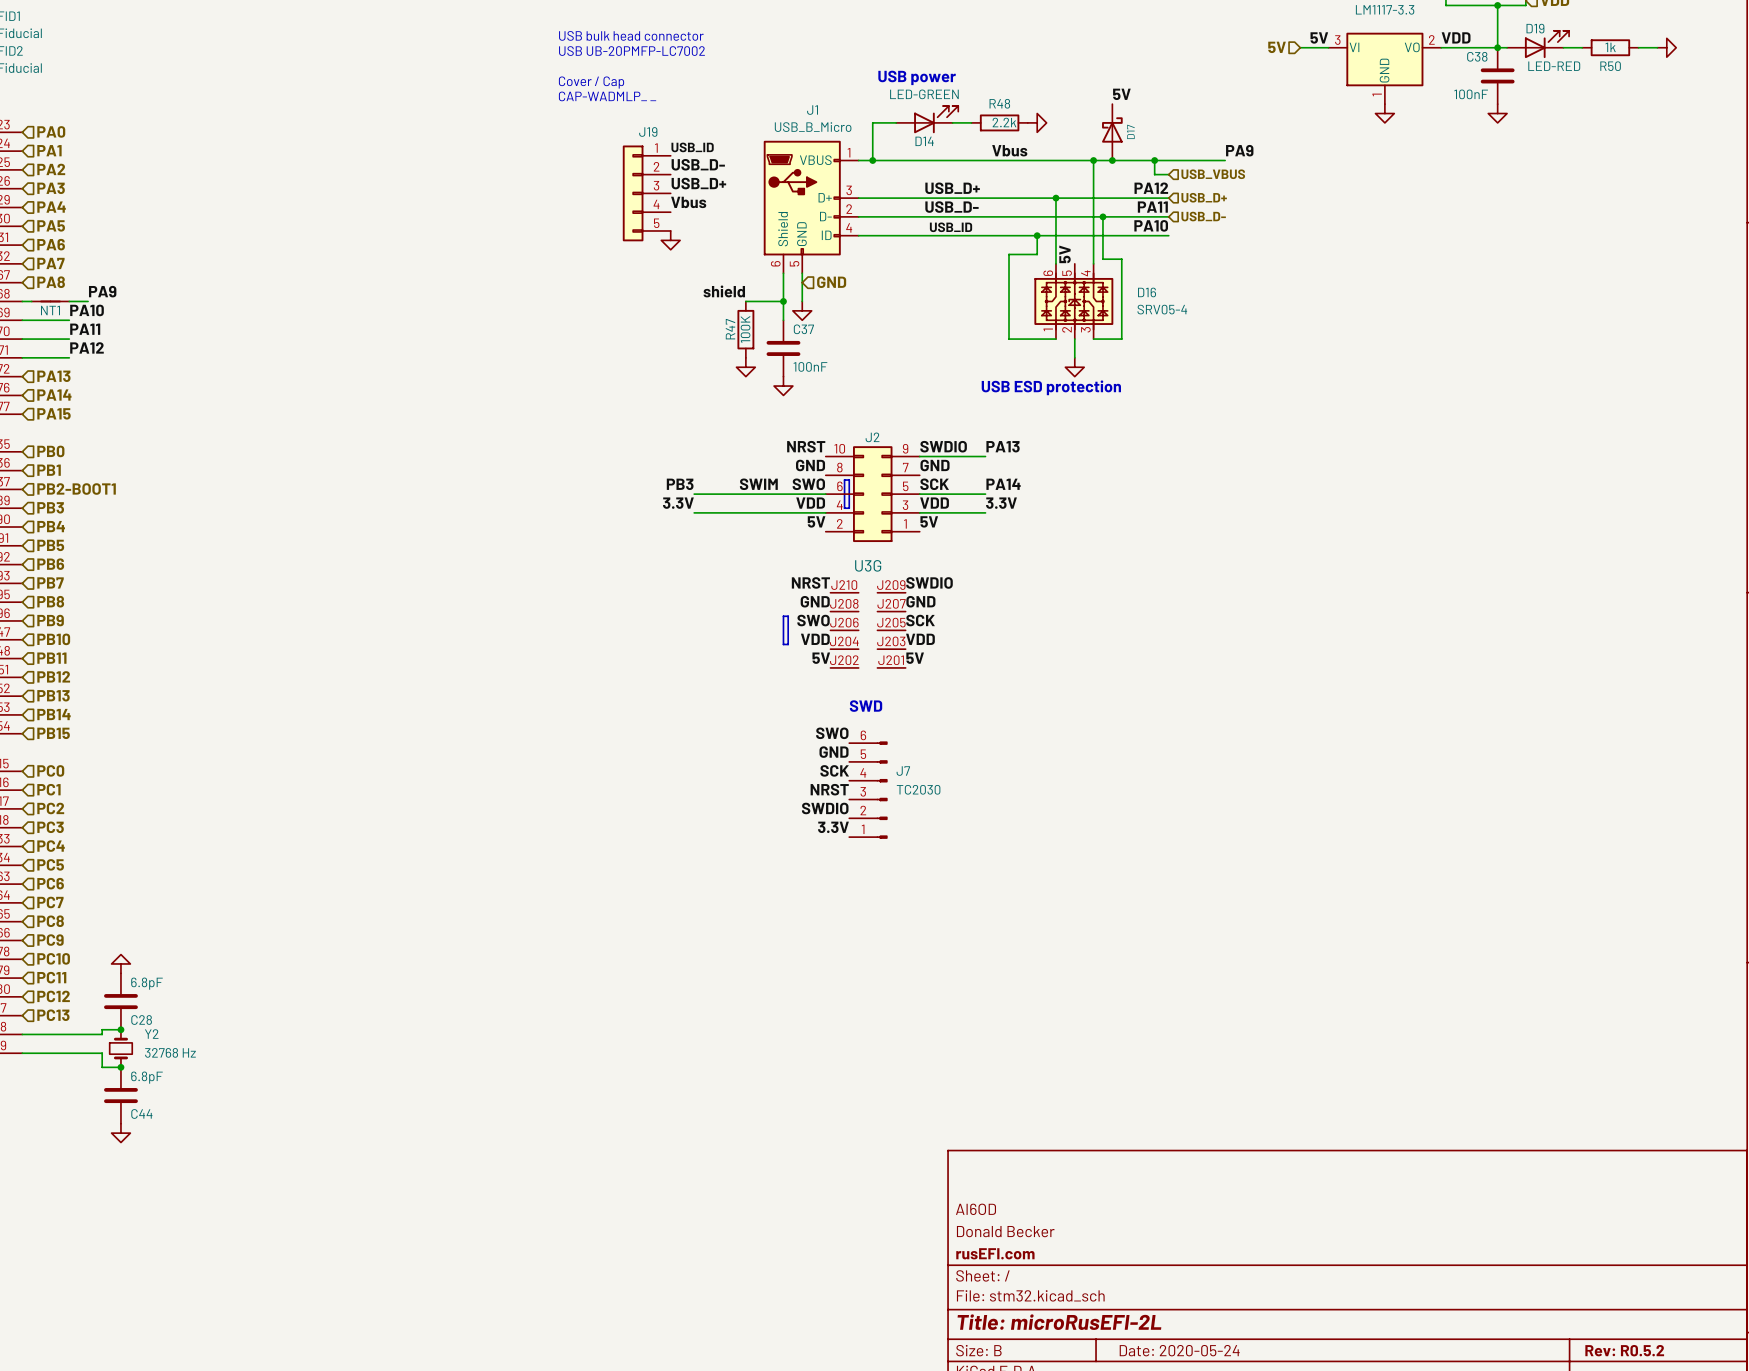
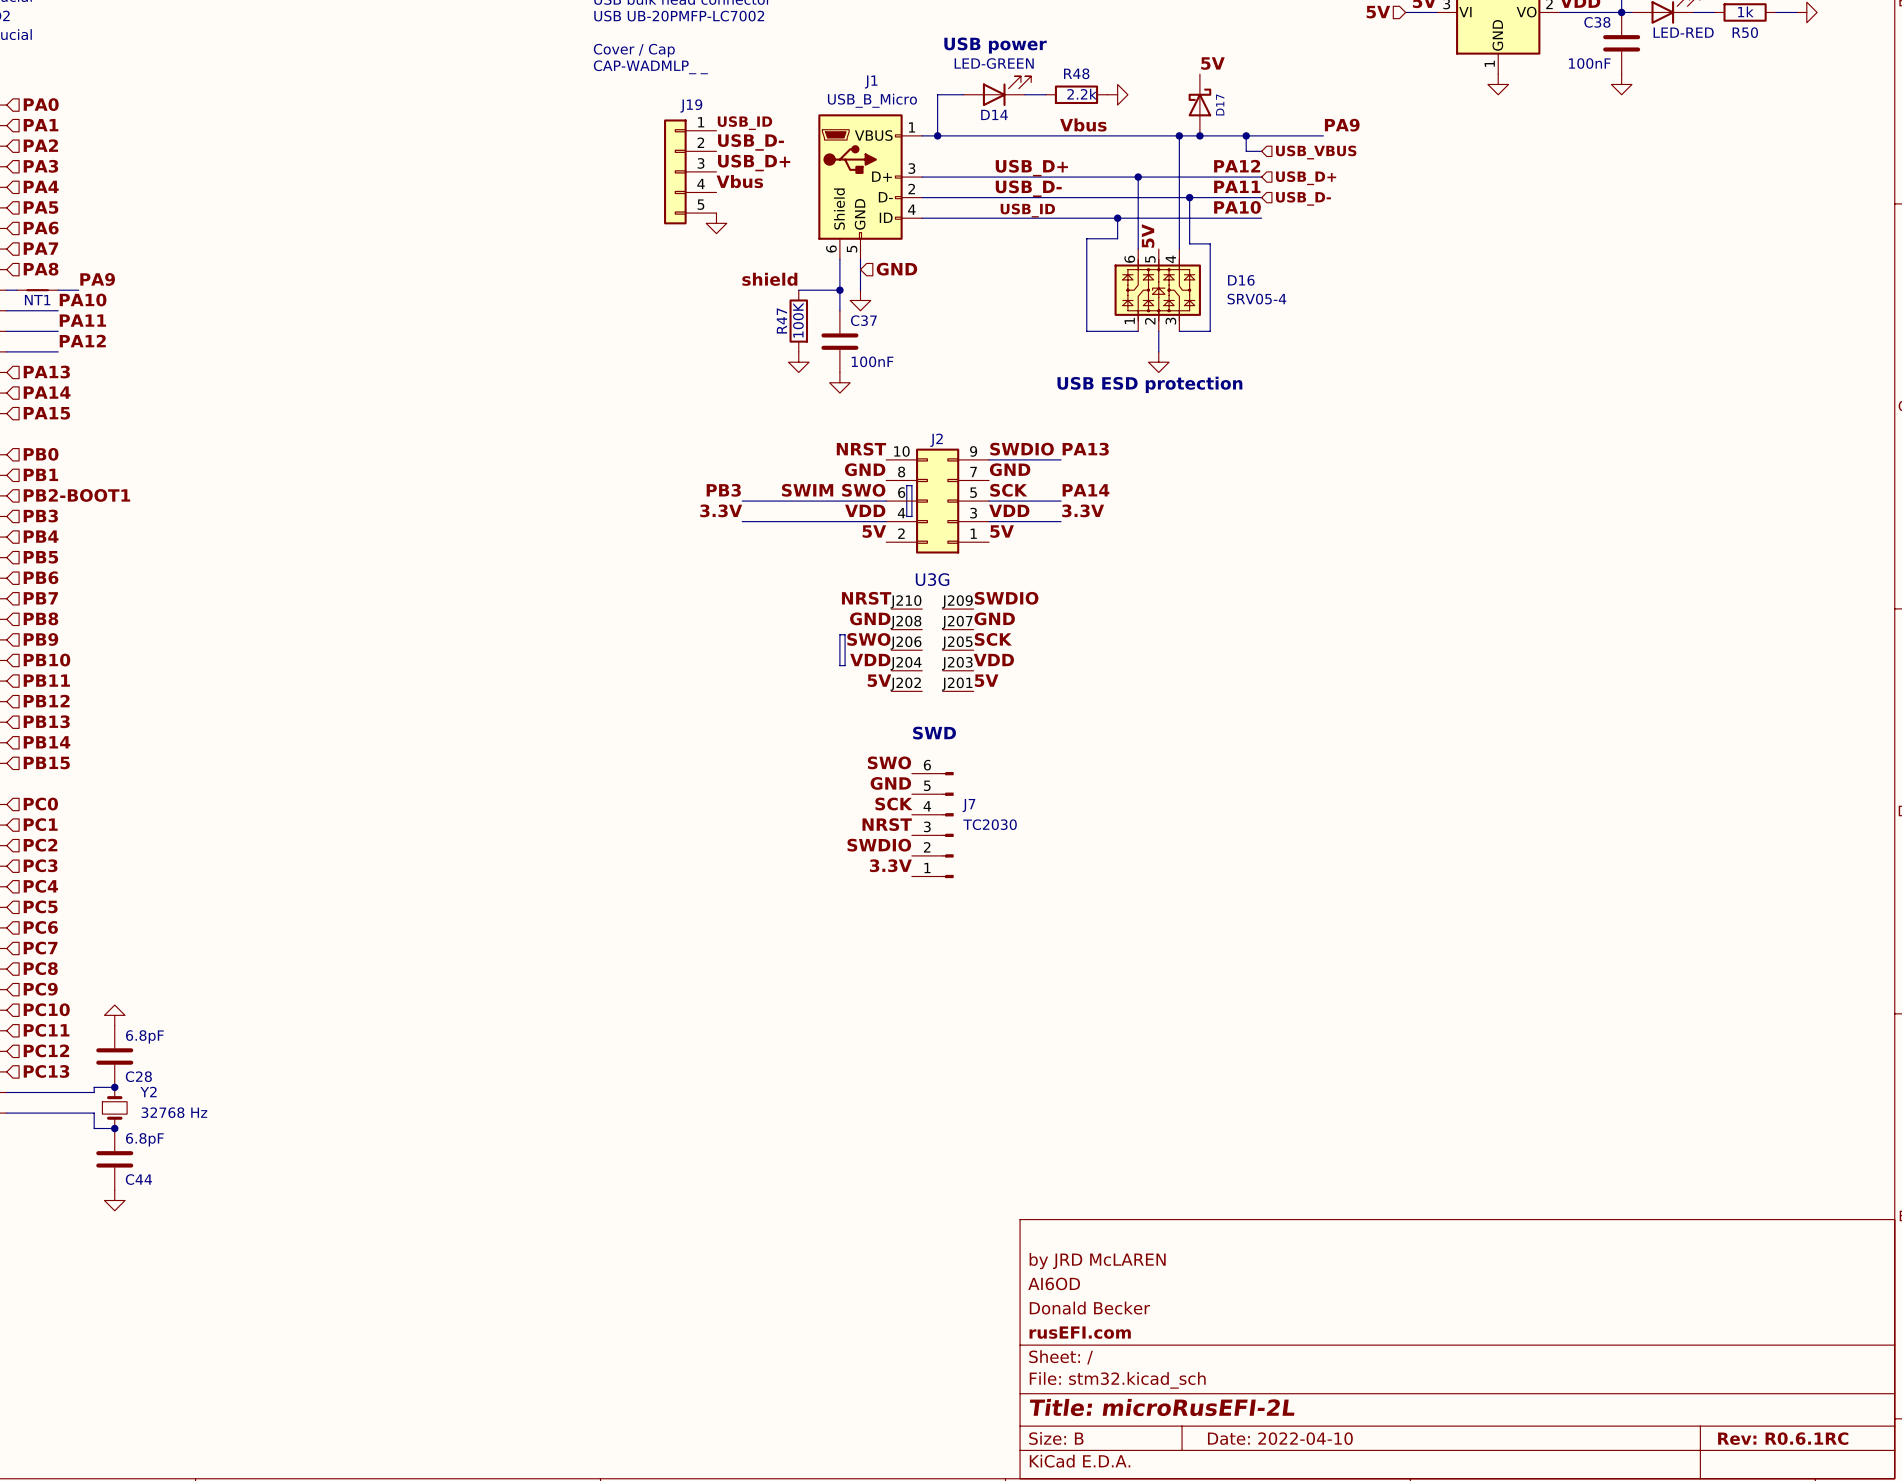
title block: none -> by JRD McLAREN (1097, 1261)
title block: Date: 2020-05-24 (1179, 1350) -> Date: 2022-04-10 (1280, 1438)
title block: Rev: R0.5.2 (1624, 1350) -> Rev: R0.6.1RC (1783, 1438)

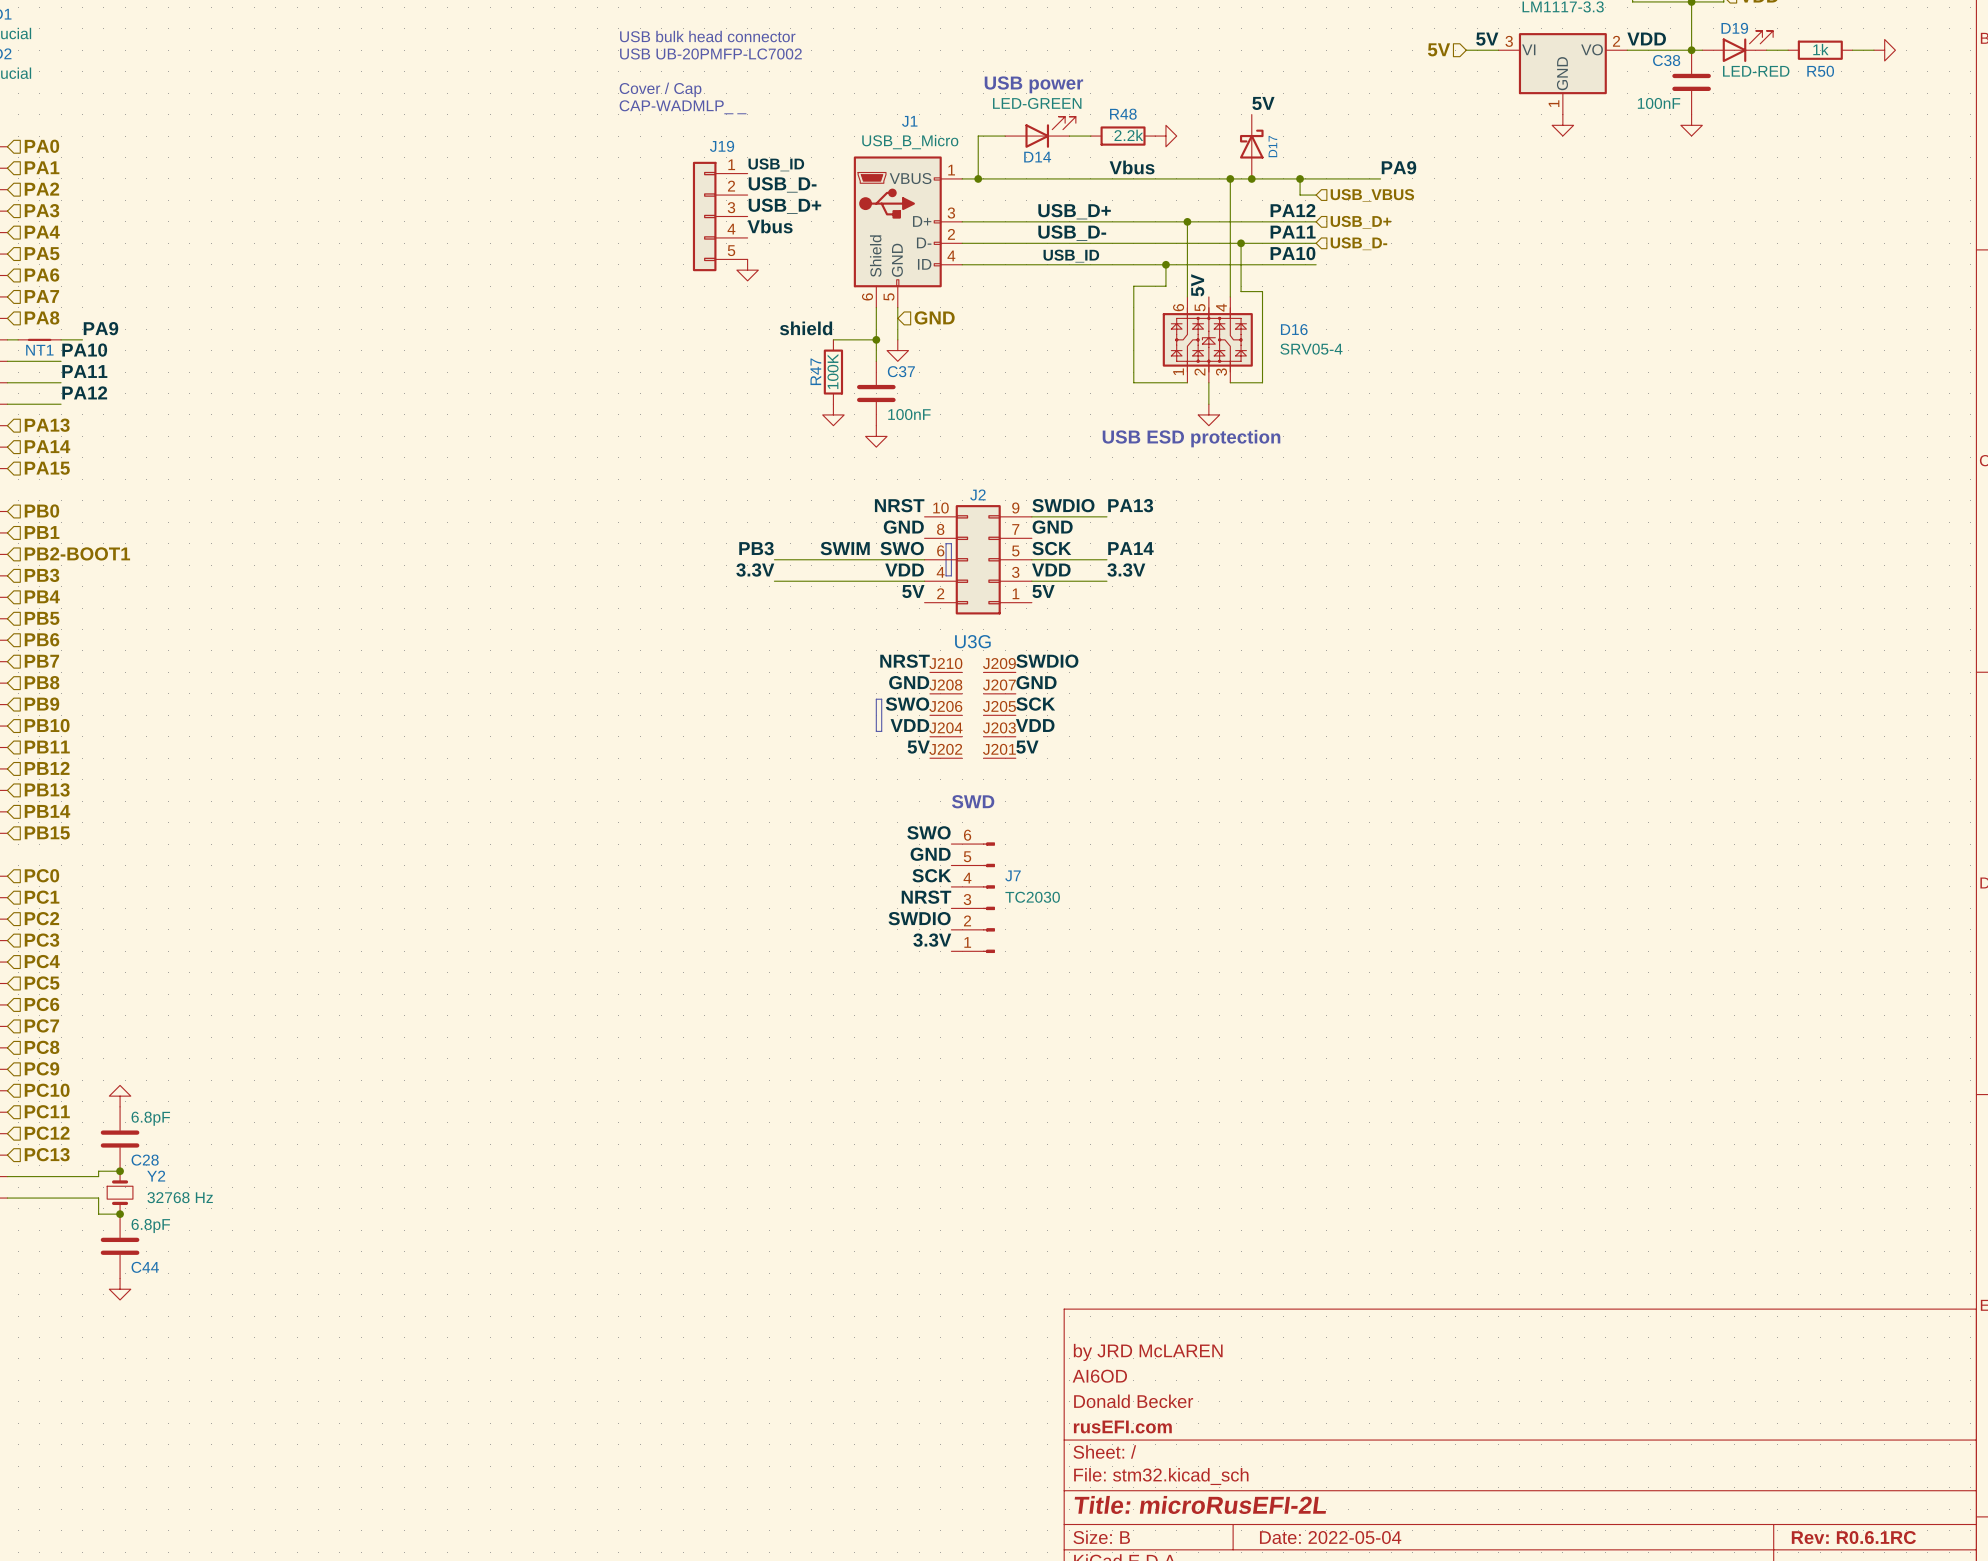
title block: Date: 2022-04-10 (1280, 1438) -> Date: 2022-05-04 (1330, 1537)

